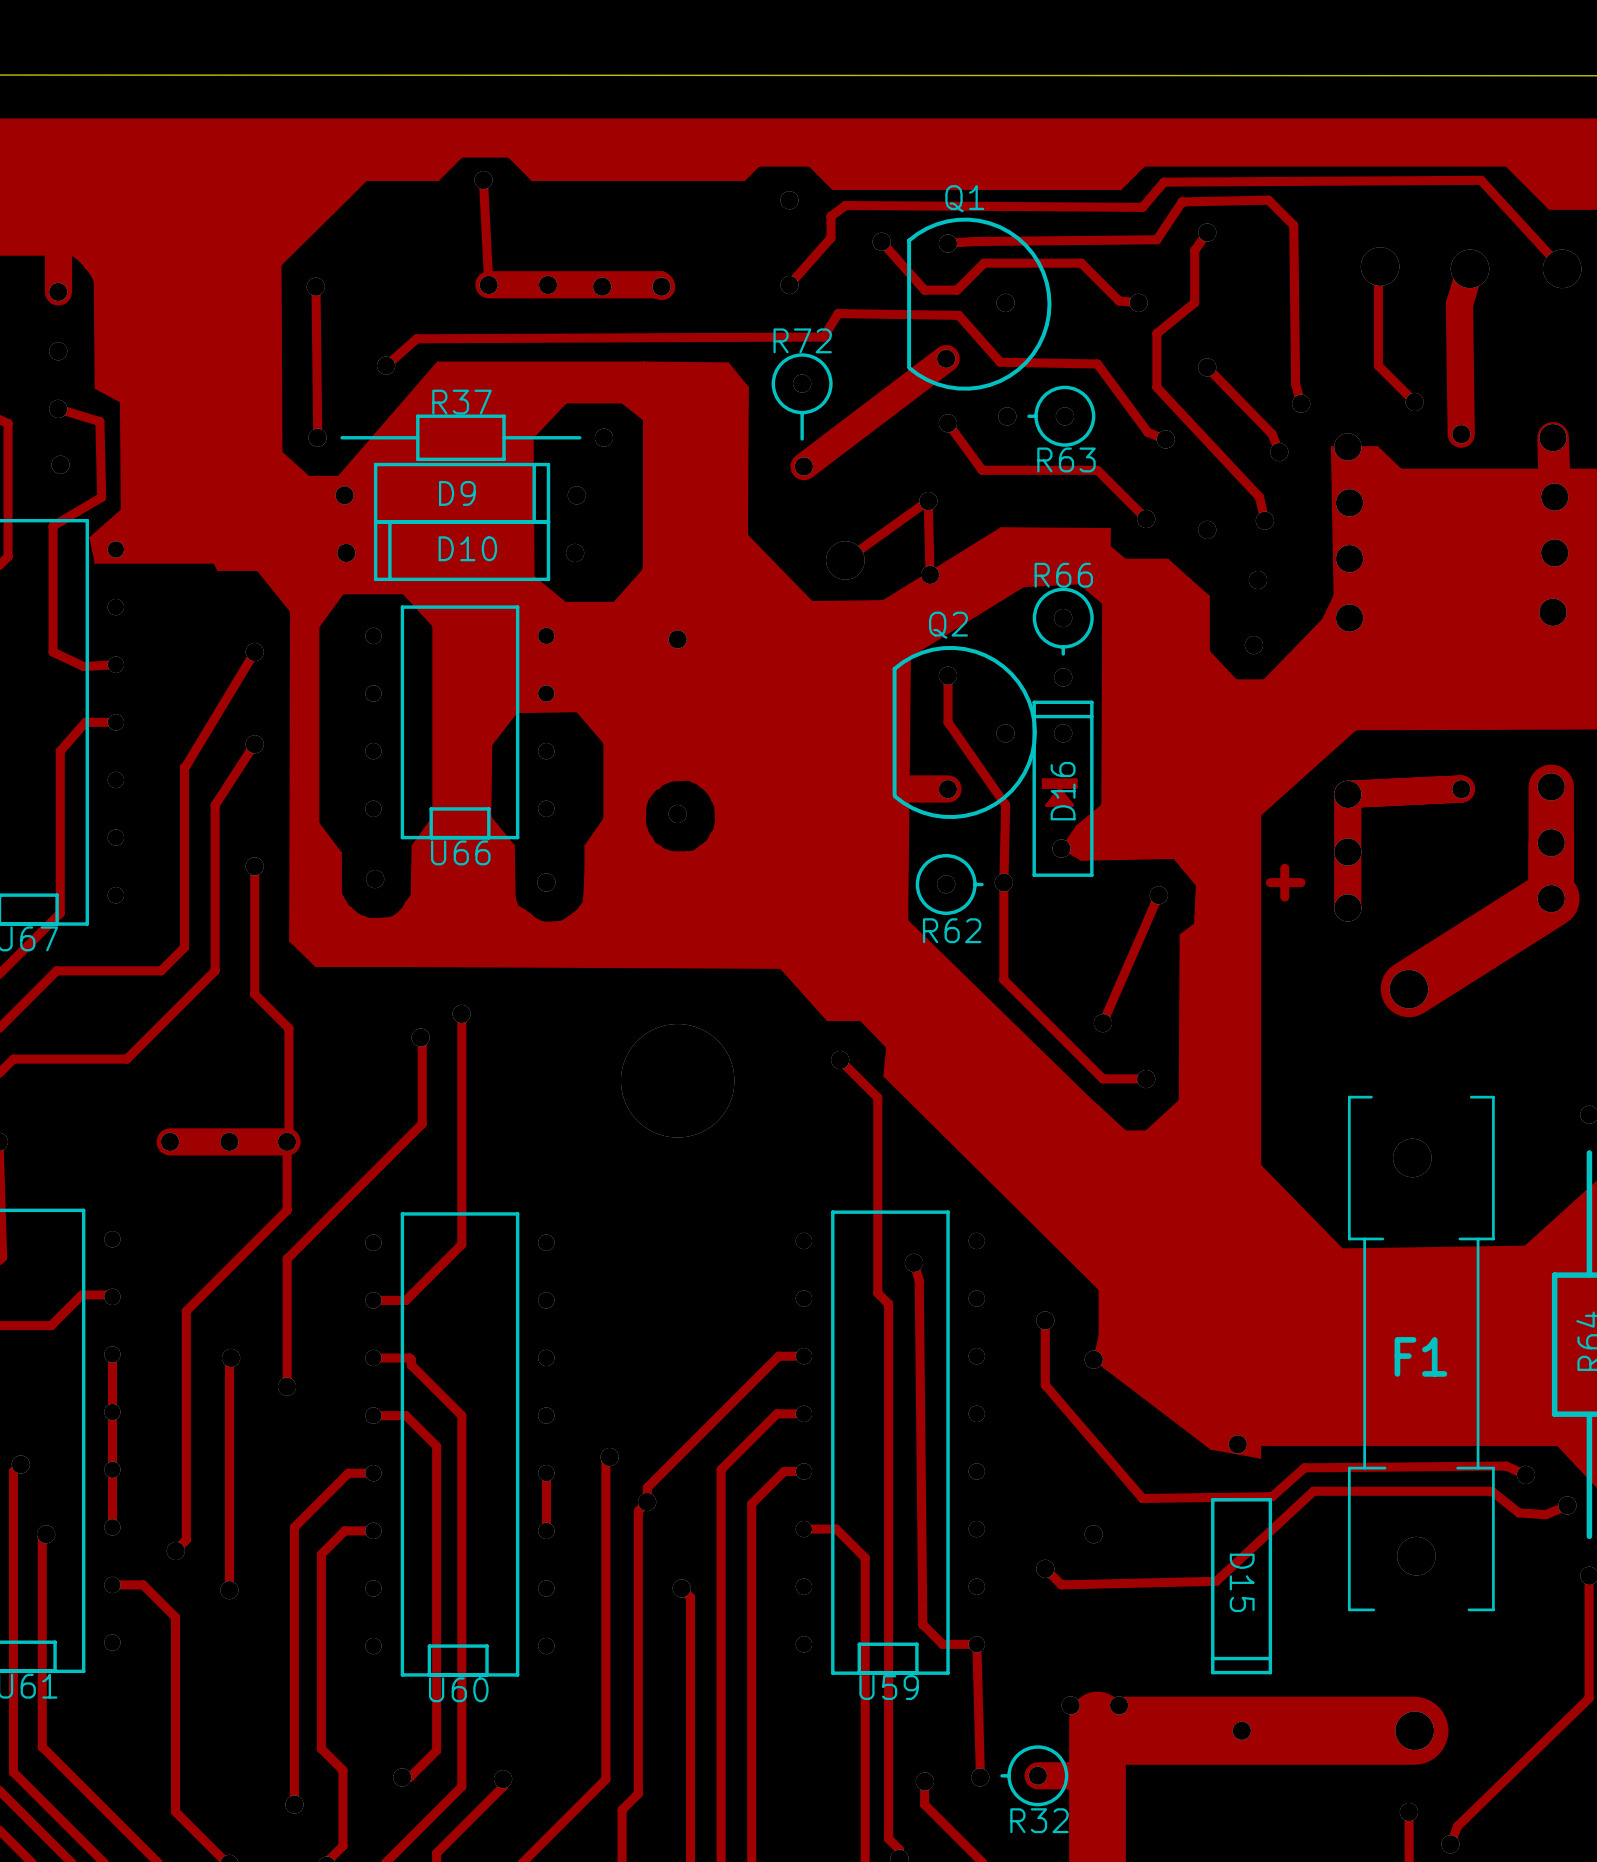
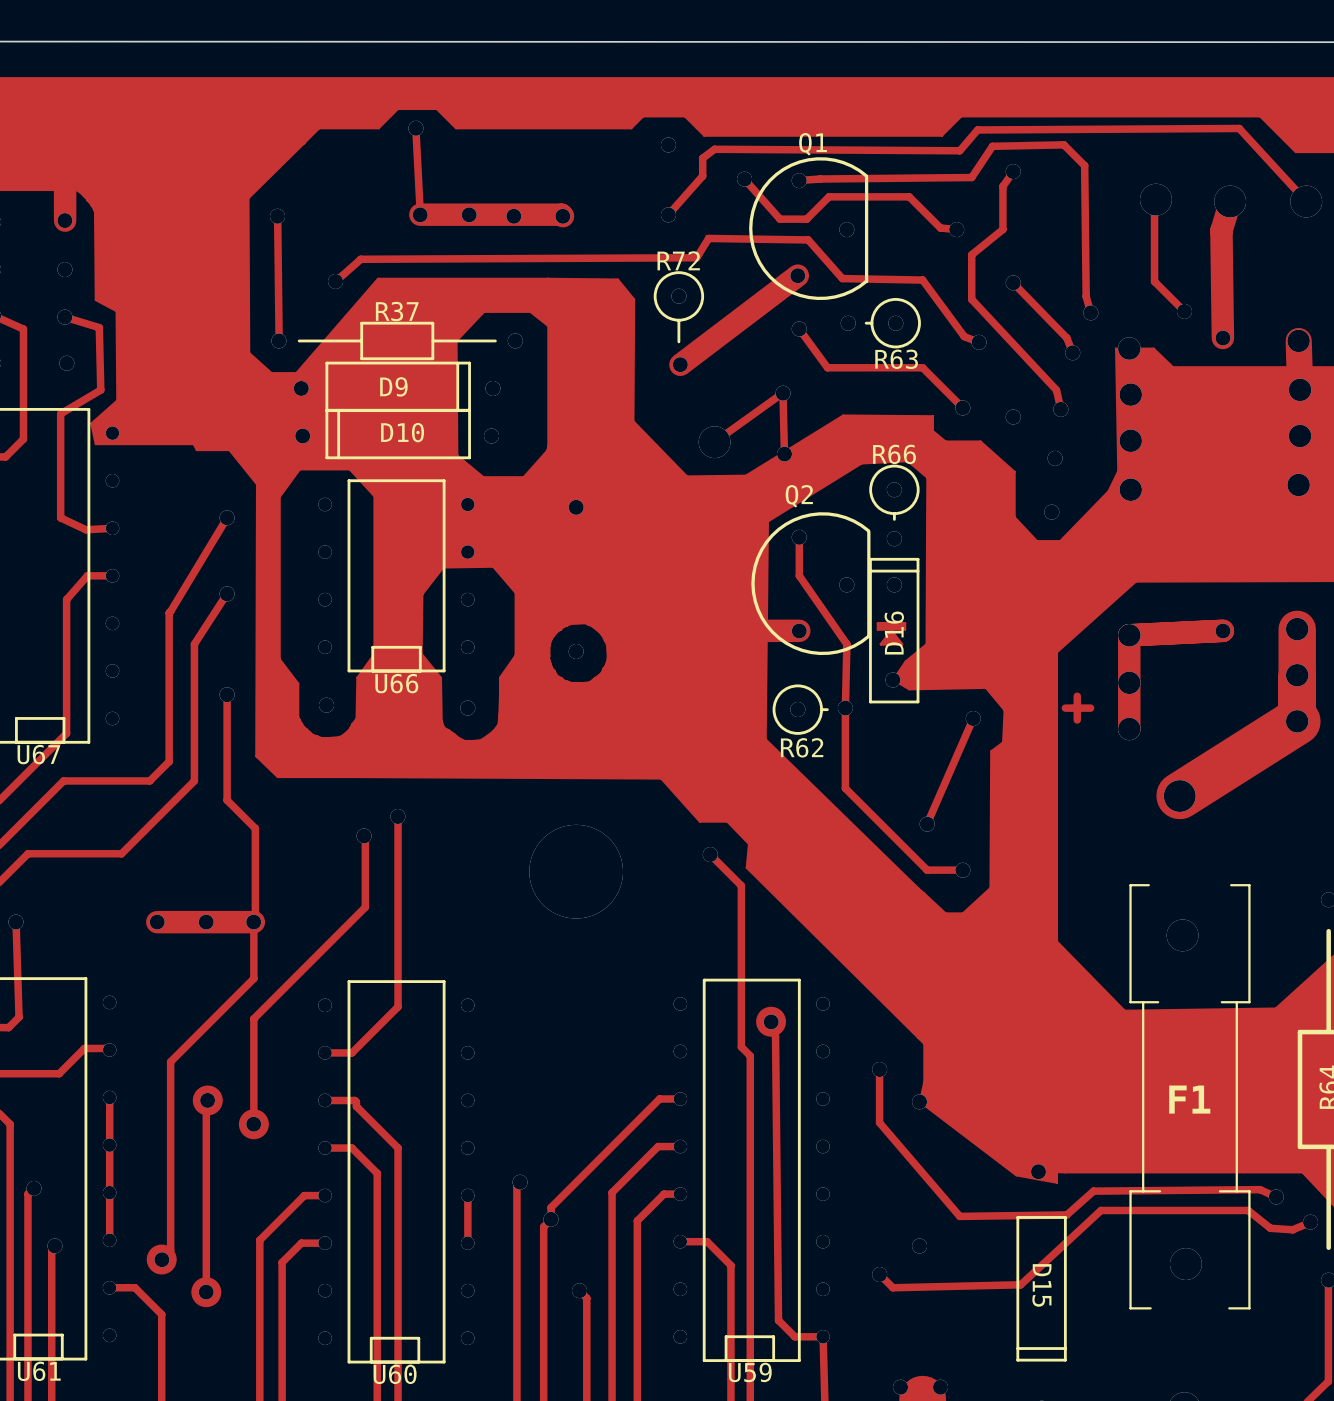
drawing shape: [907, 217, 1052, 391] -> [749, 157, 869, 301]
drawing shape: [892, 645, 1037, 819] -> [751, 512, 871, 656]
drawing: none -> [756, 1006, 787, 1037]
drawing: none -> [192, 1085, 269, 1140]
drawing: none -> [146, 1244, 222, 1308]

